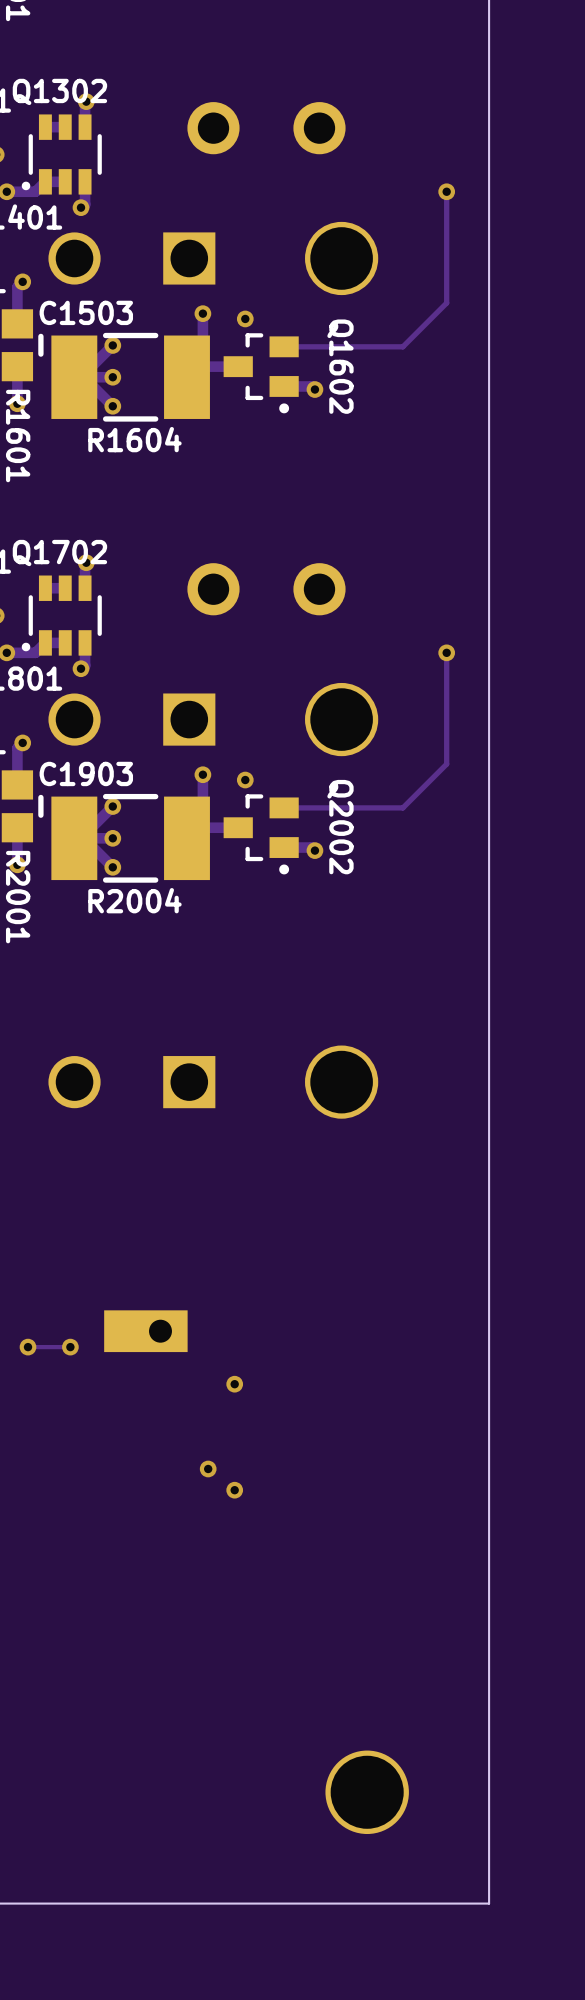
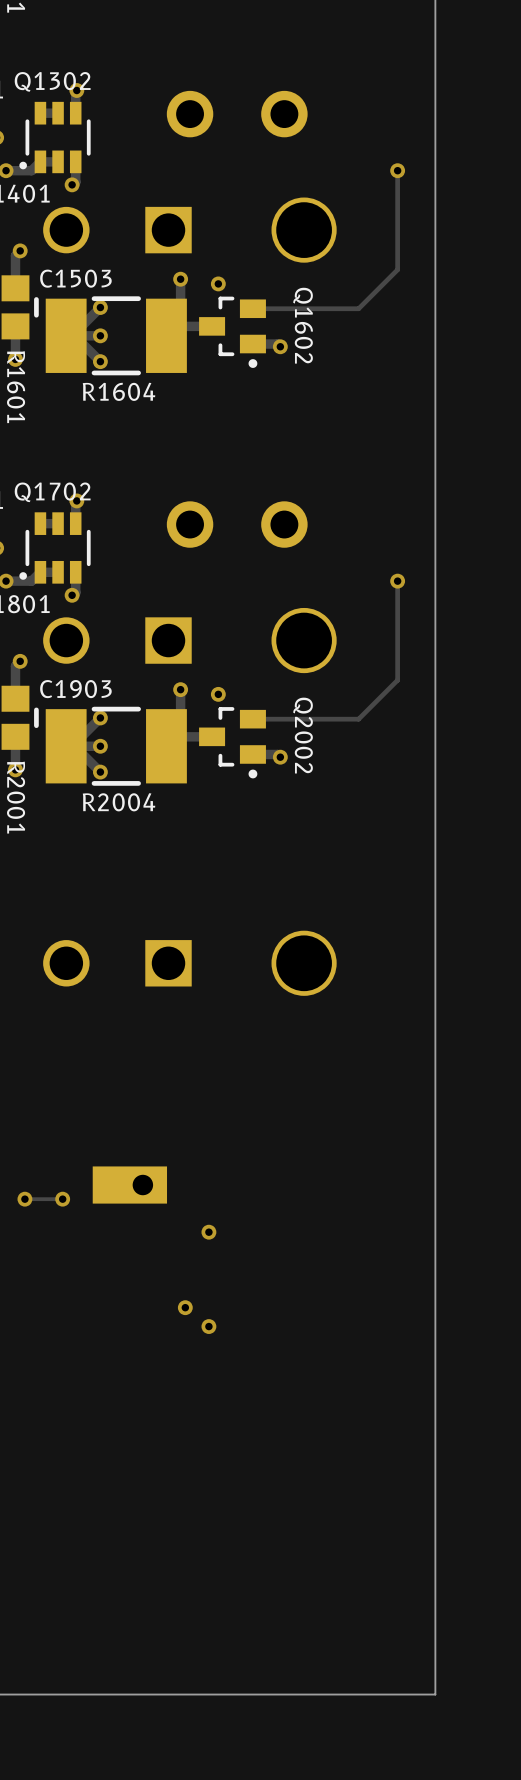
part: (367, 1792) -> none

